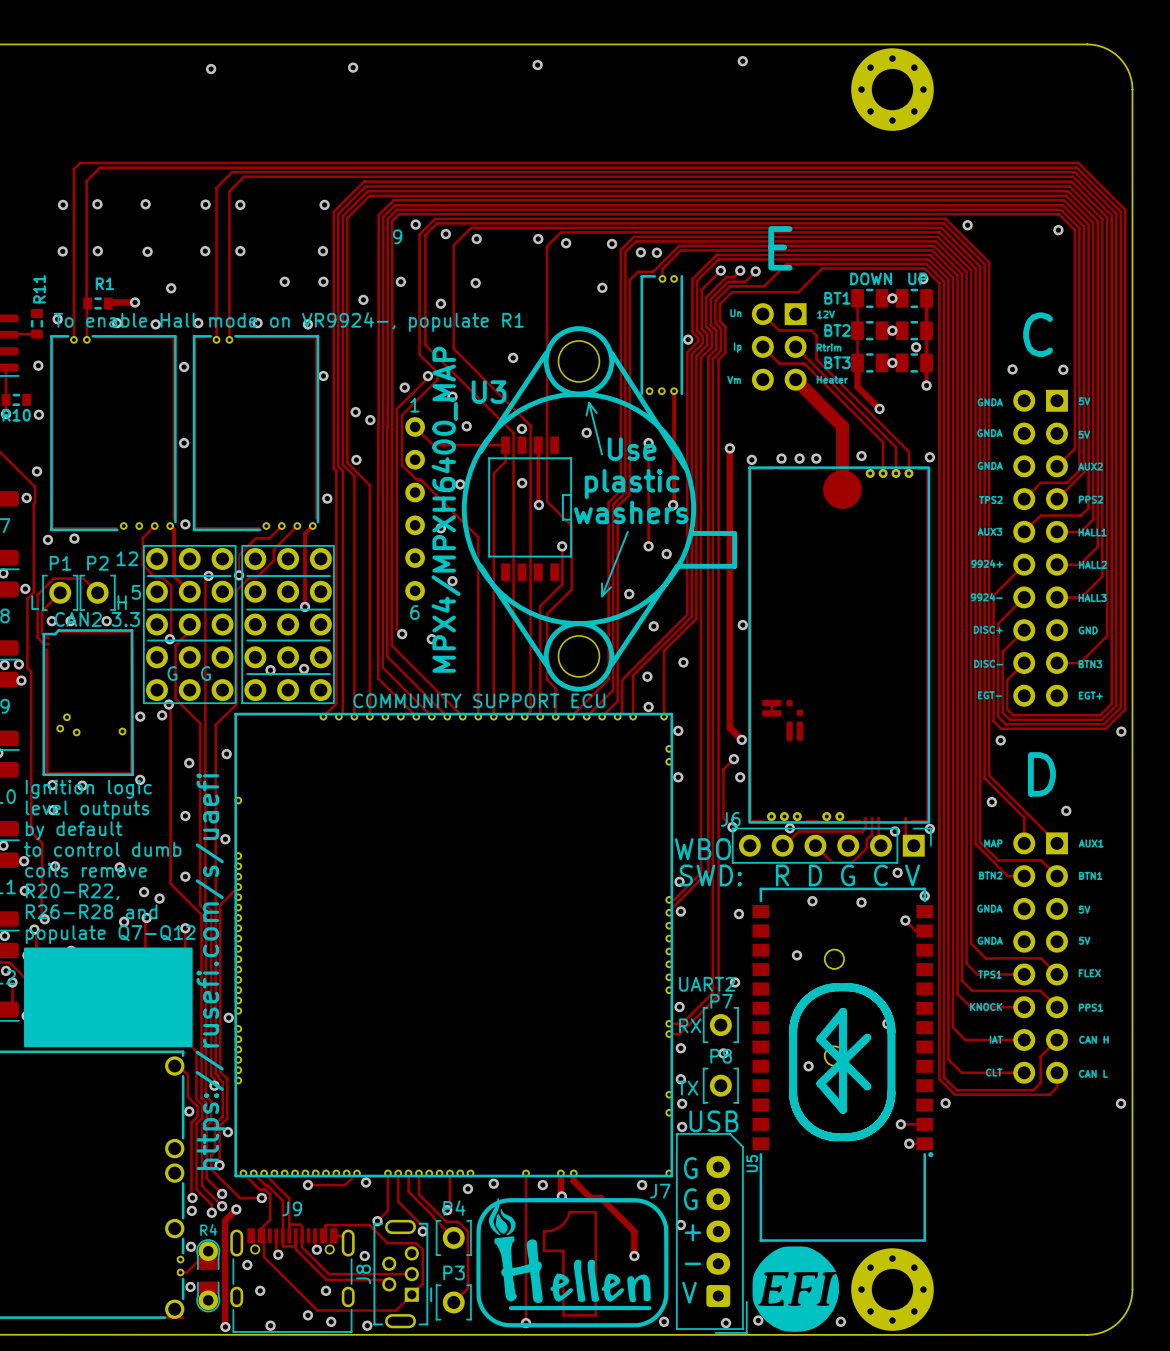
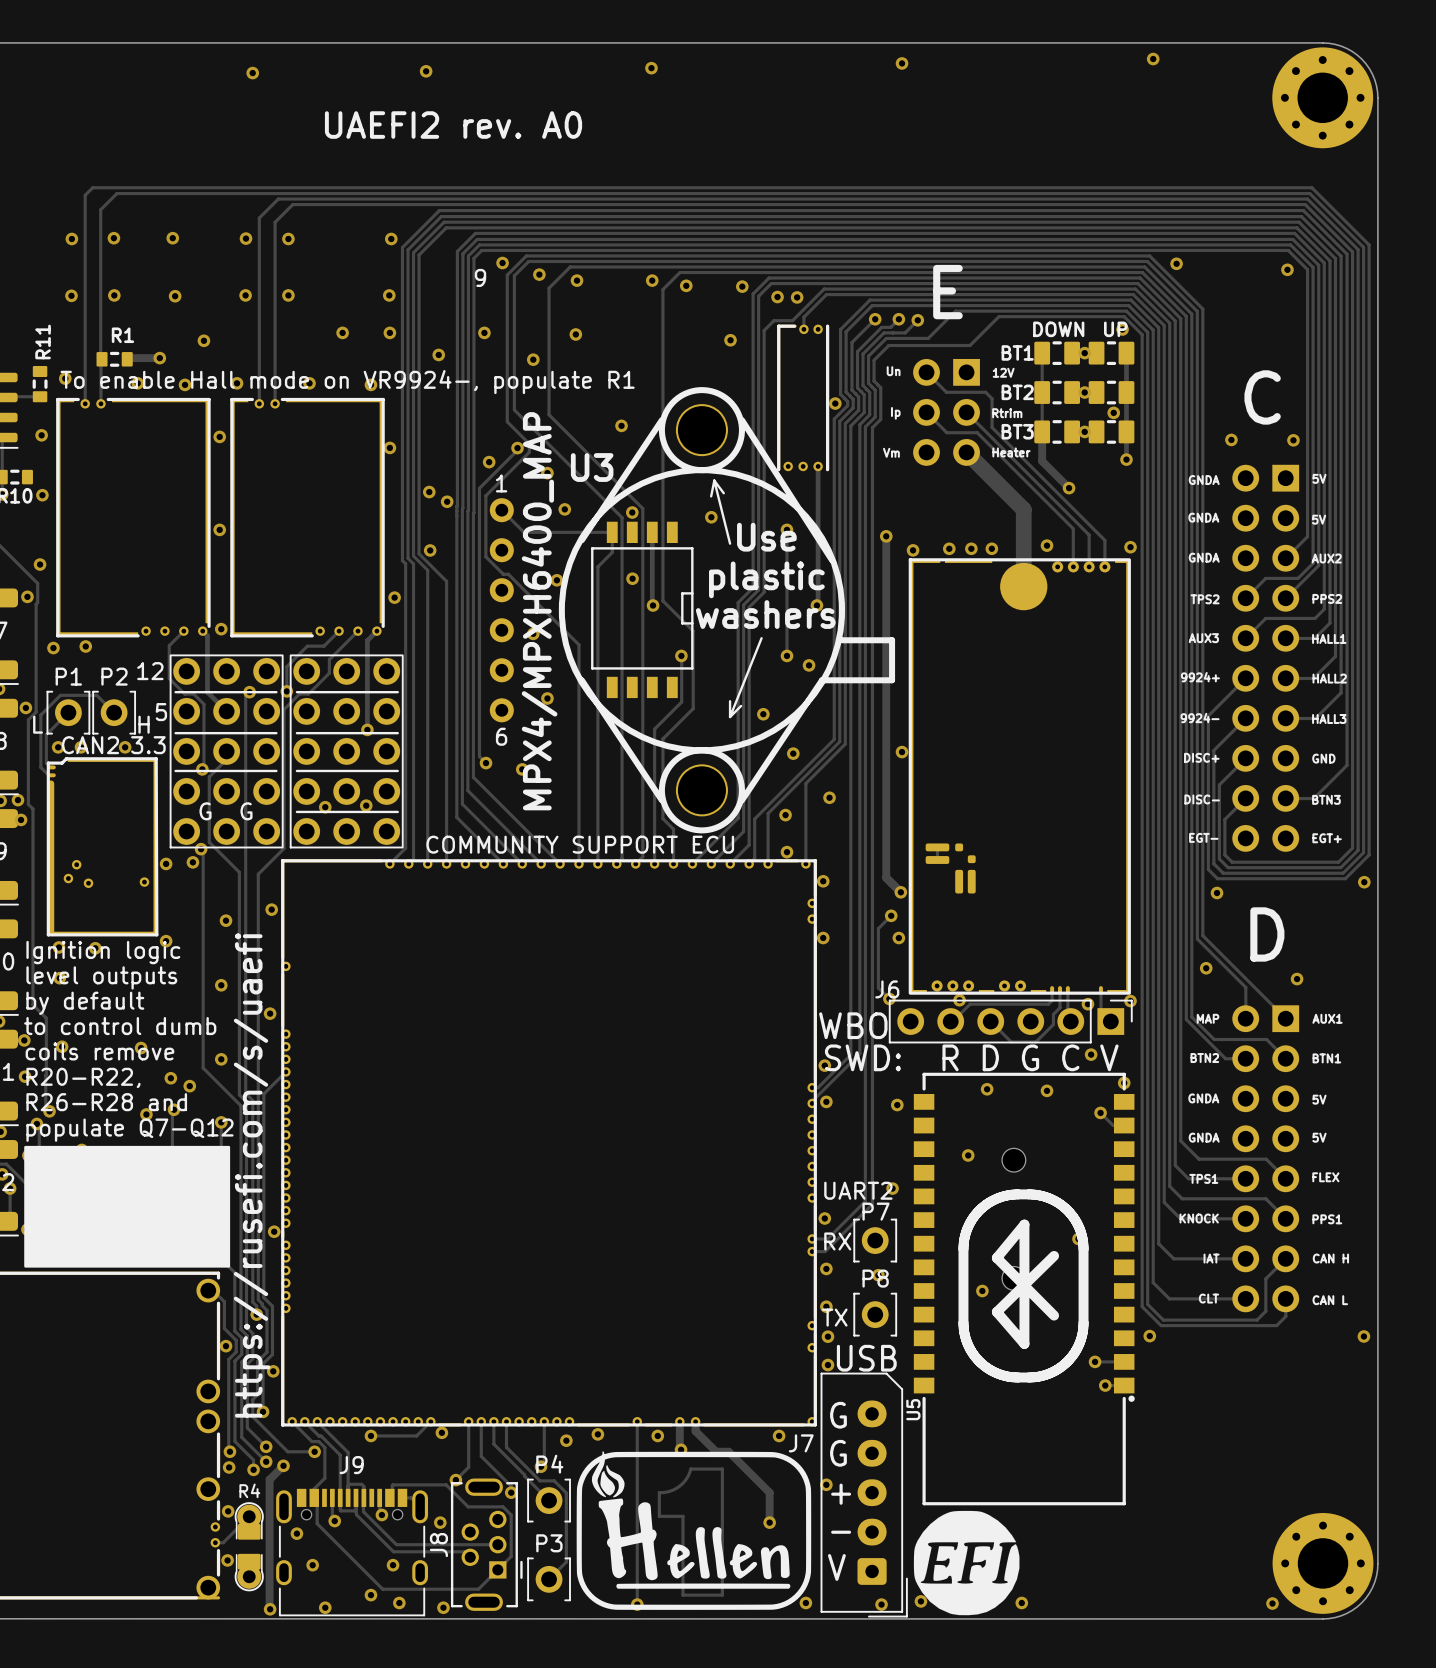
via: none -> (1153, 59)
part position: (892, 89) -> (1322, 97)
text: none -> UAEFI2 rev. A0 (453, 125)
part position: (892, 1289) -> (1323, 1563)
via: none -> (1272, 1603)

